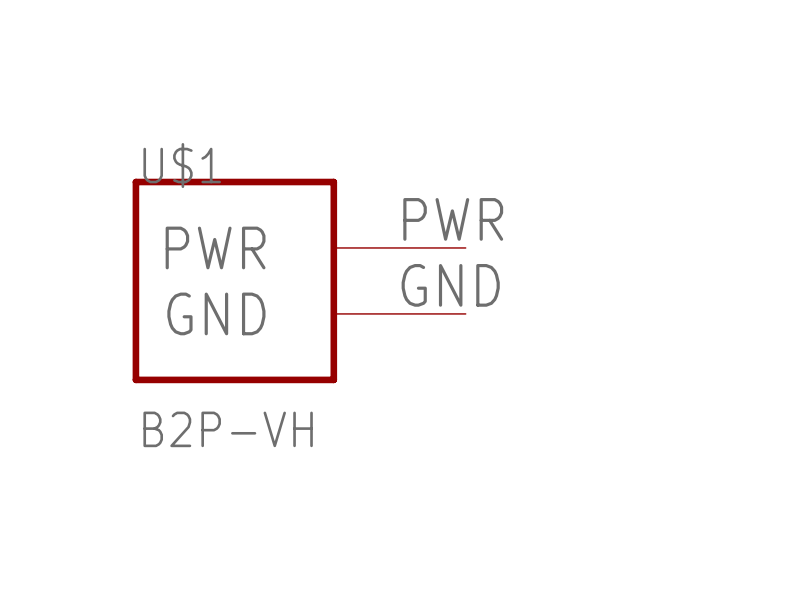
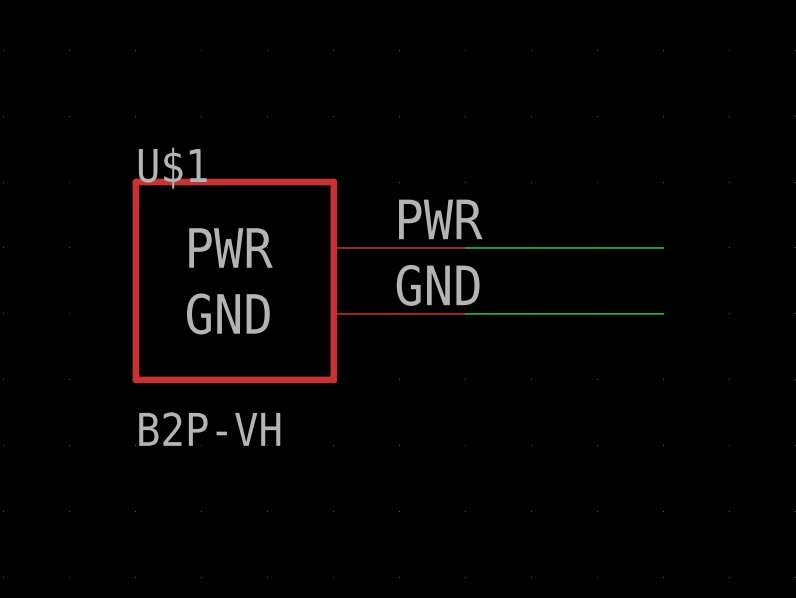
wire: none -> (465, 247) (663, 247)
wire: none -> (465, 313) (663, 313)

